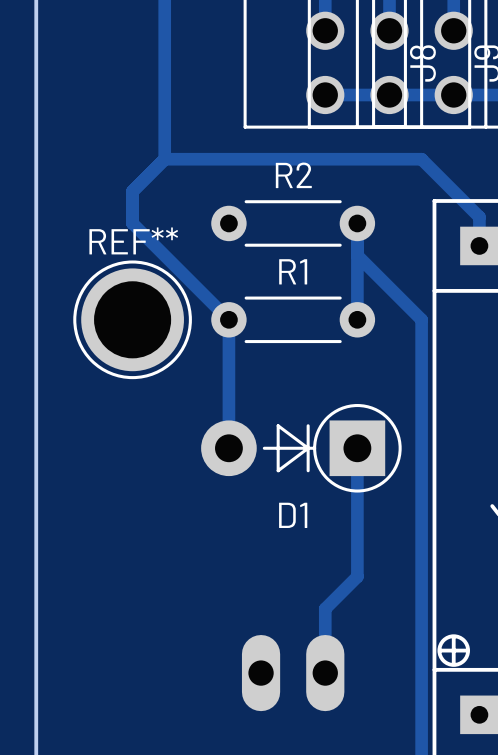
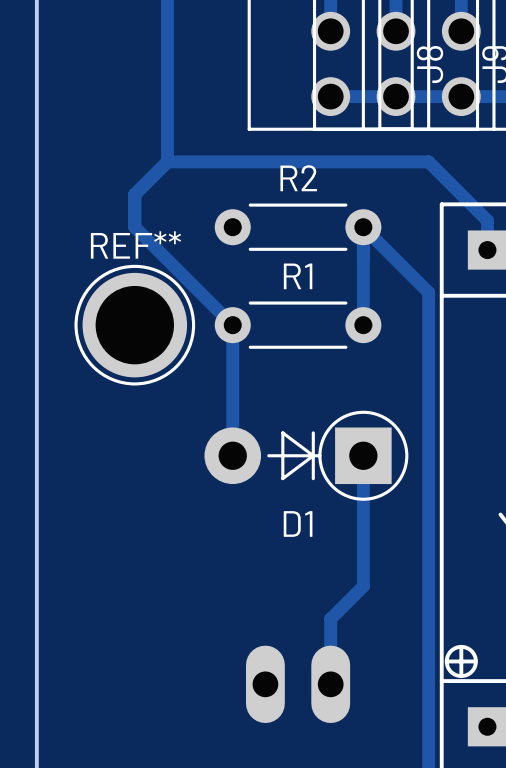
track: (357, 255) (421, 319) -> (363, 227) (428, 292) (428, 325)

